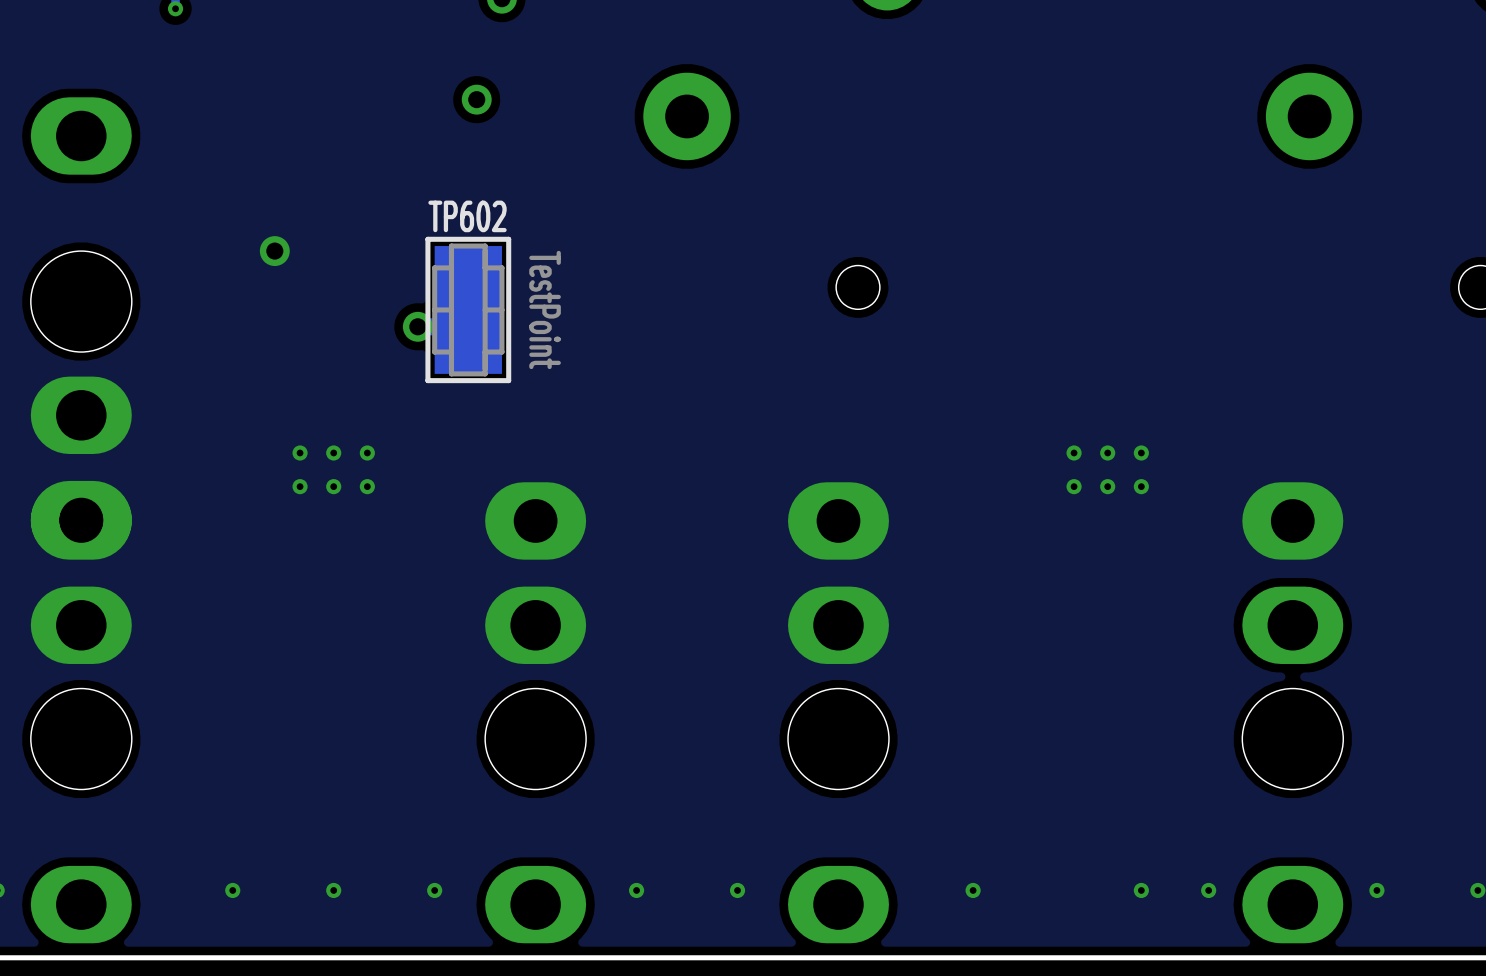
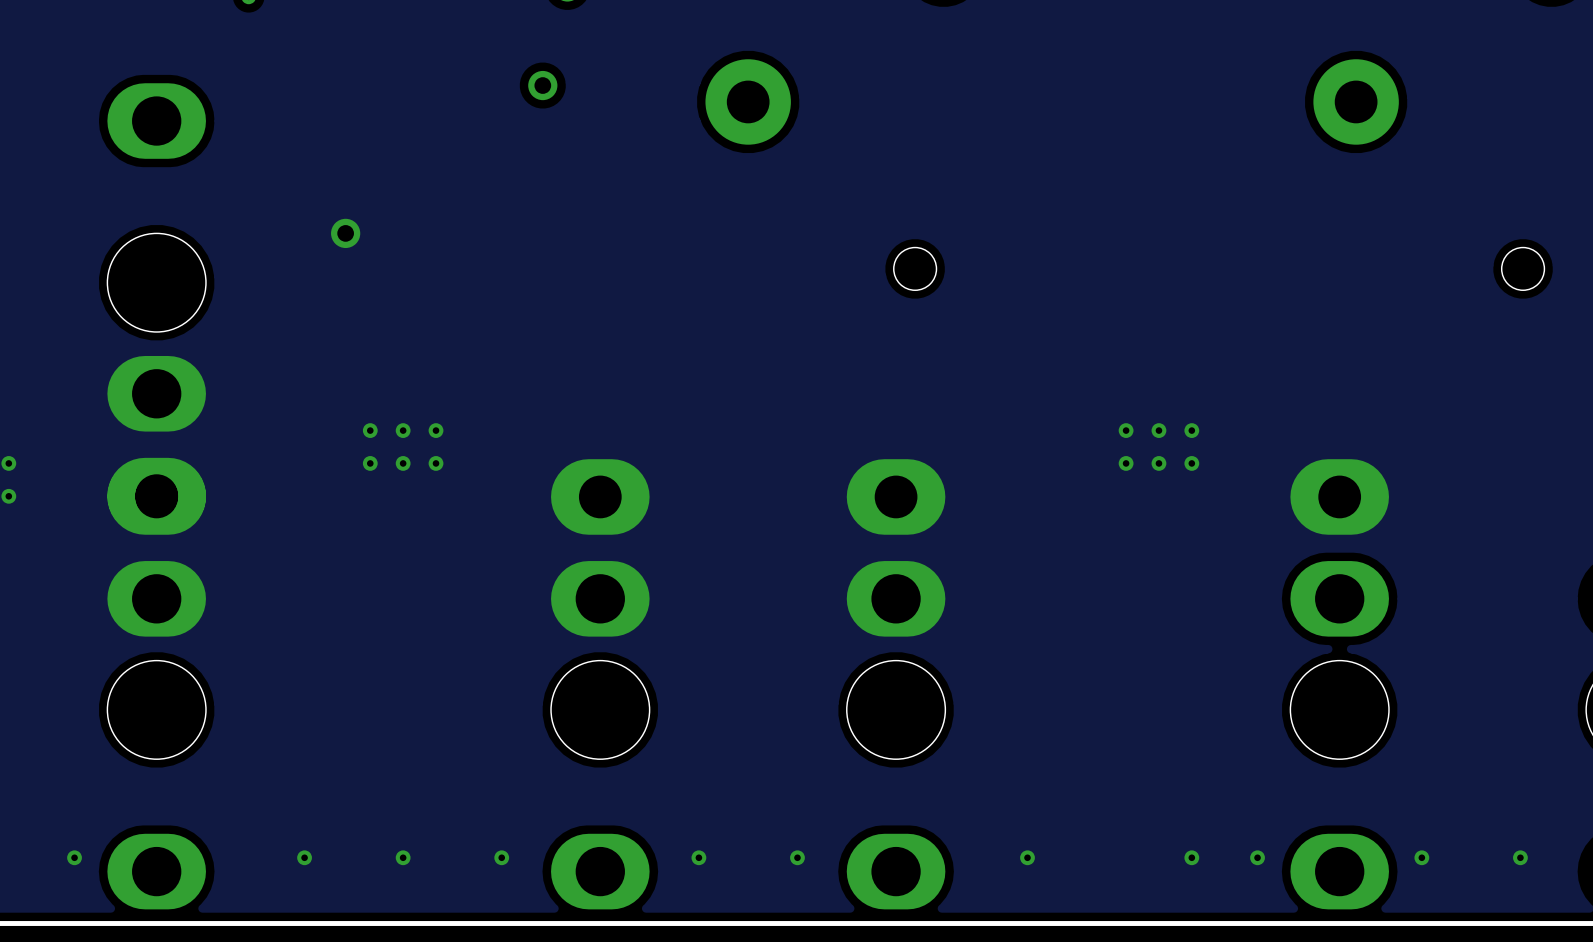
TP602: TestPoint (468, 309) -> none
via: (417, 326) -> none

